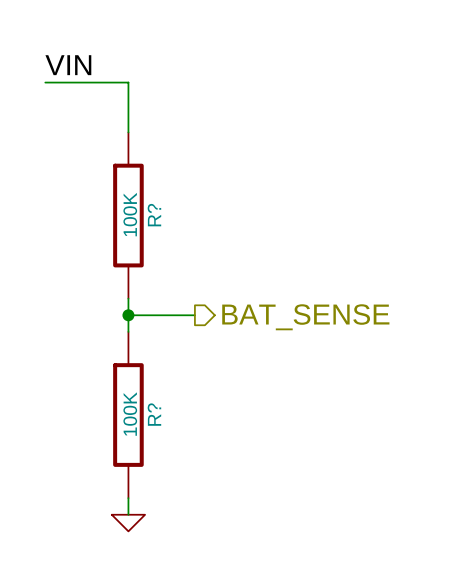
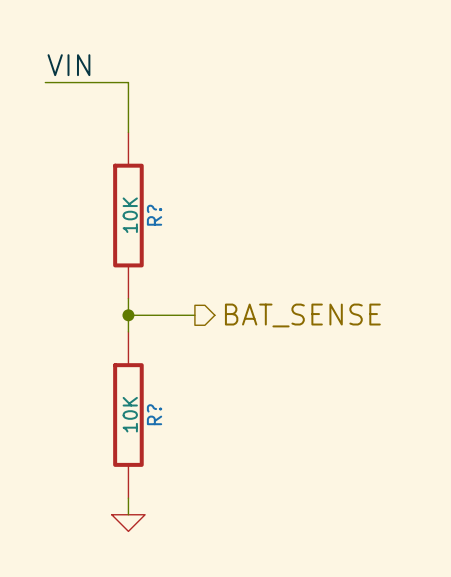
R? value: 100K (130, 214) -> 10K (130, 215)
R? value: 100K (130, 414) -> 10K (130, 414)

